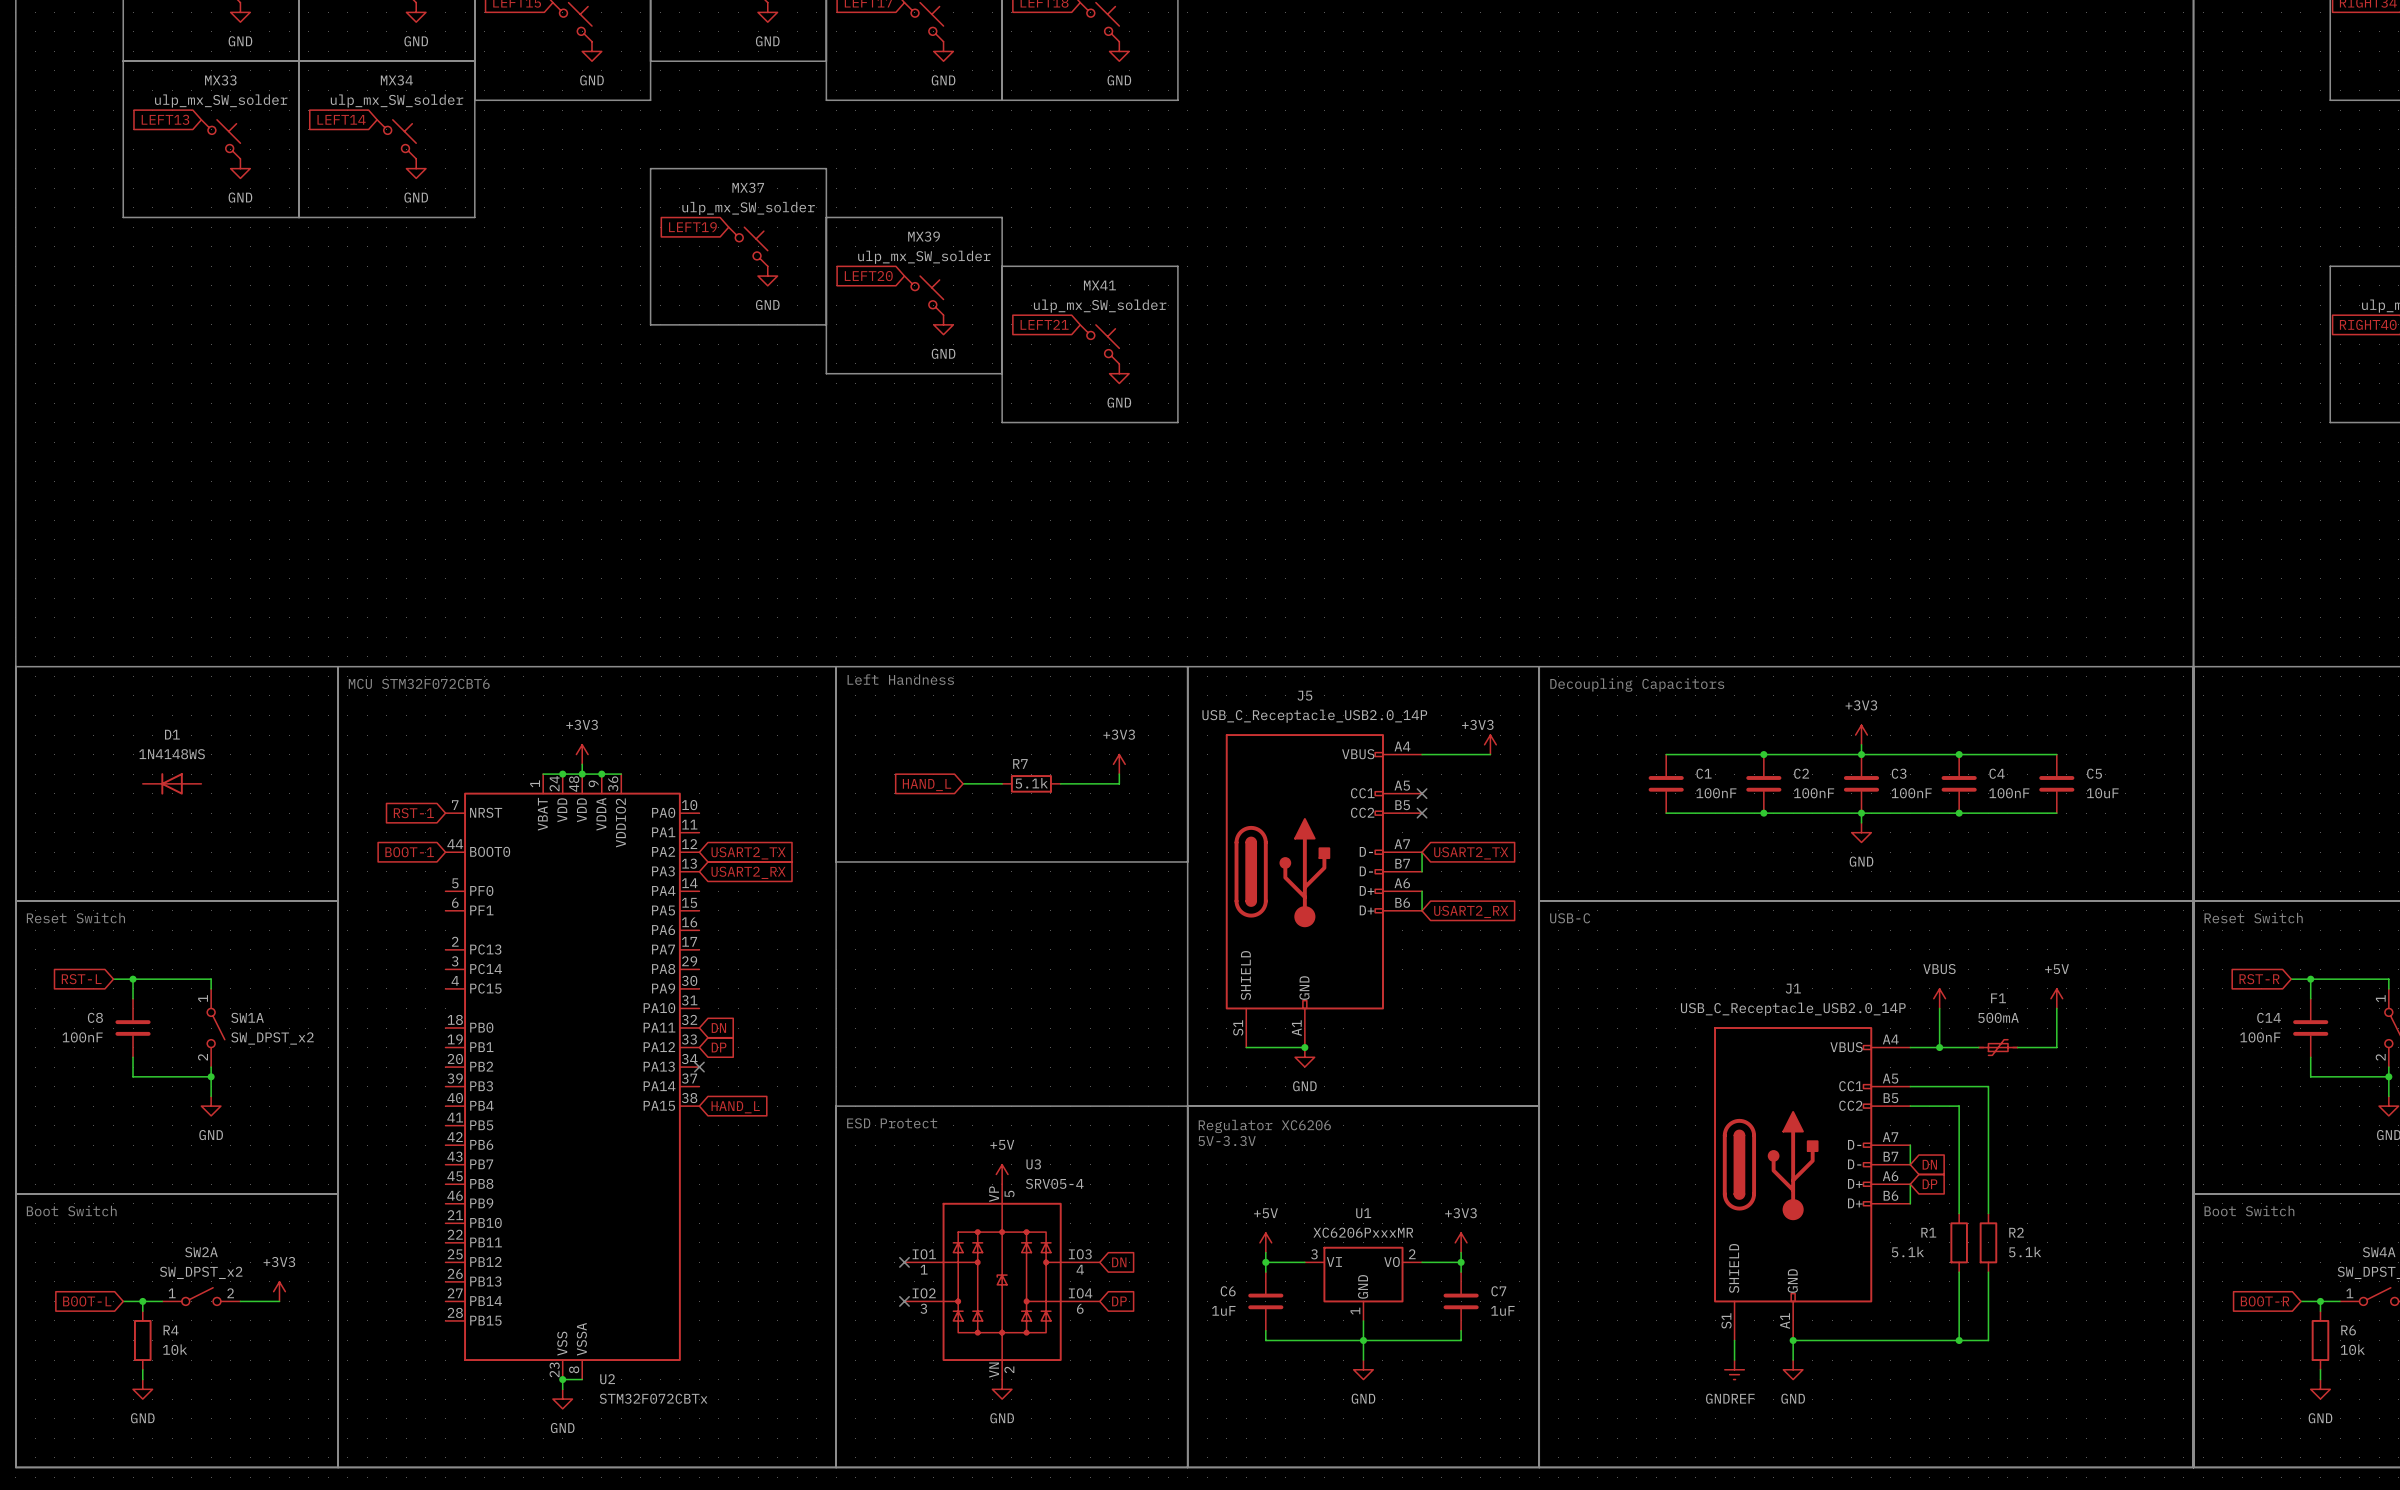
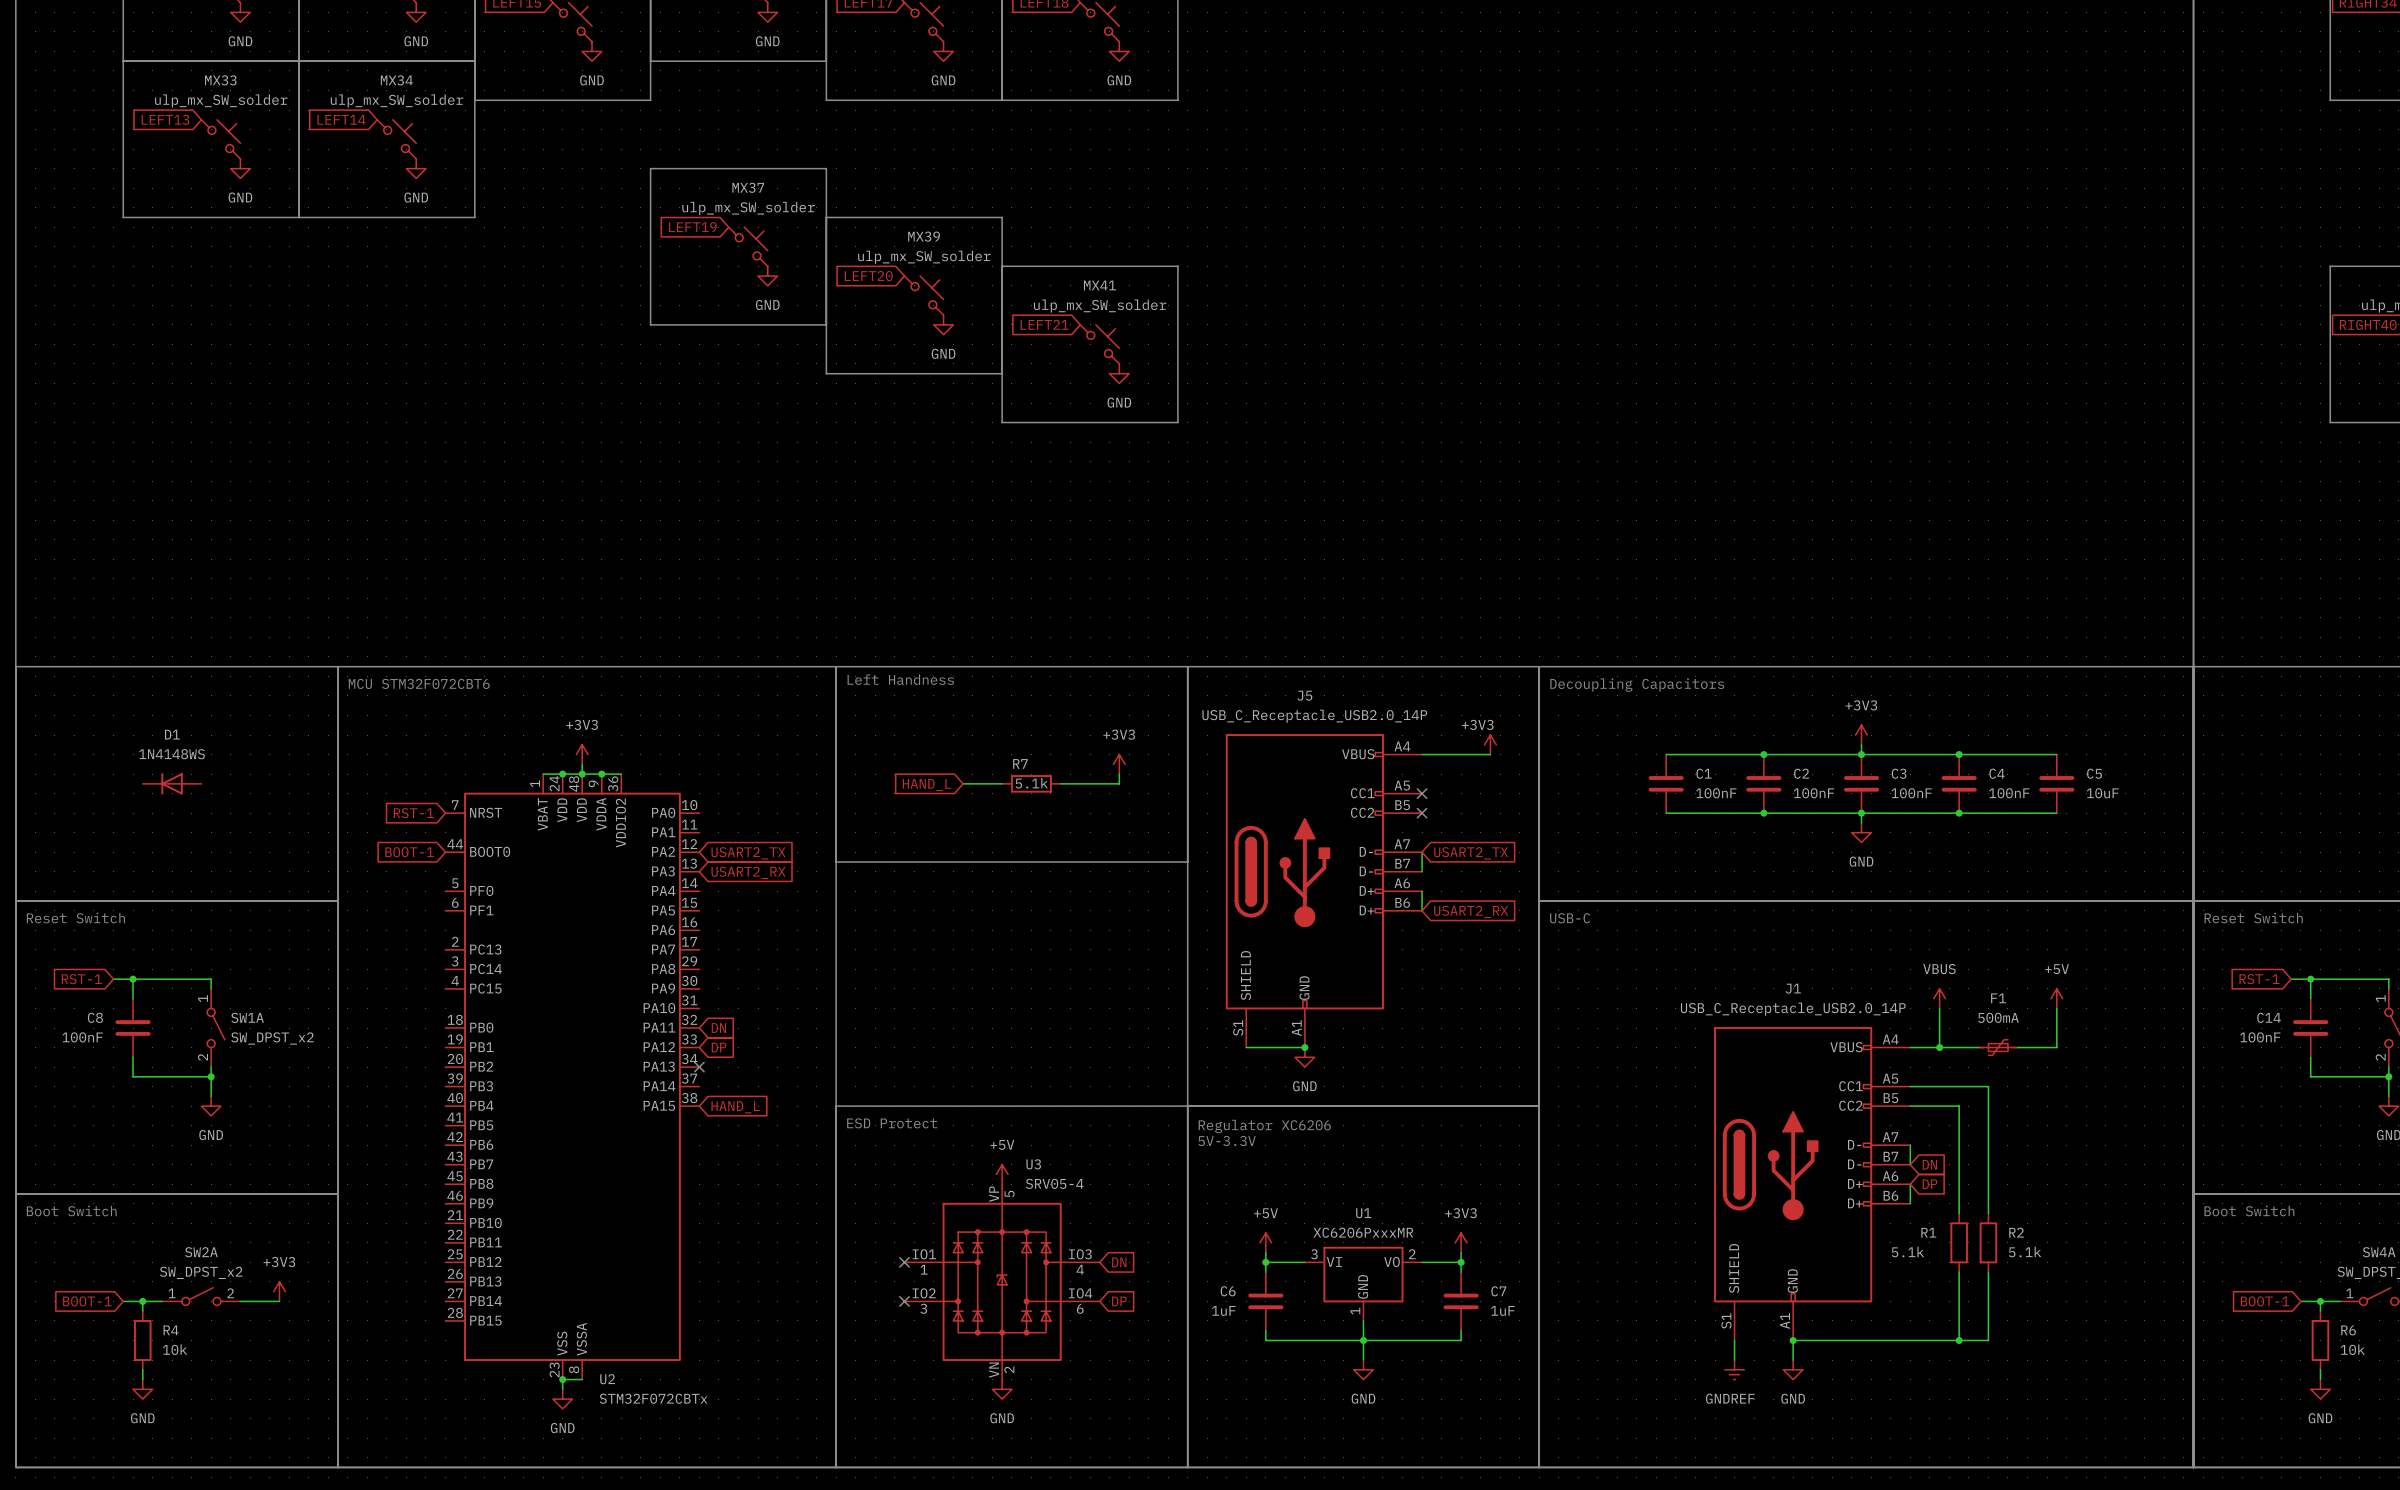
global label: RST-L (81, 979) -> RST-1 (81, 979)
global label: RST-R (2259, 979) -> RST-1 (2259, 979)
global label: BOOT-L (87, 1301) -> BOOT-1 (87, 1301)
global label: BOOT-R (2265, 1301) -> BOOT-1 (2265, 1301)

